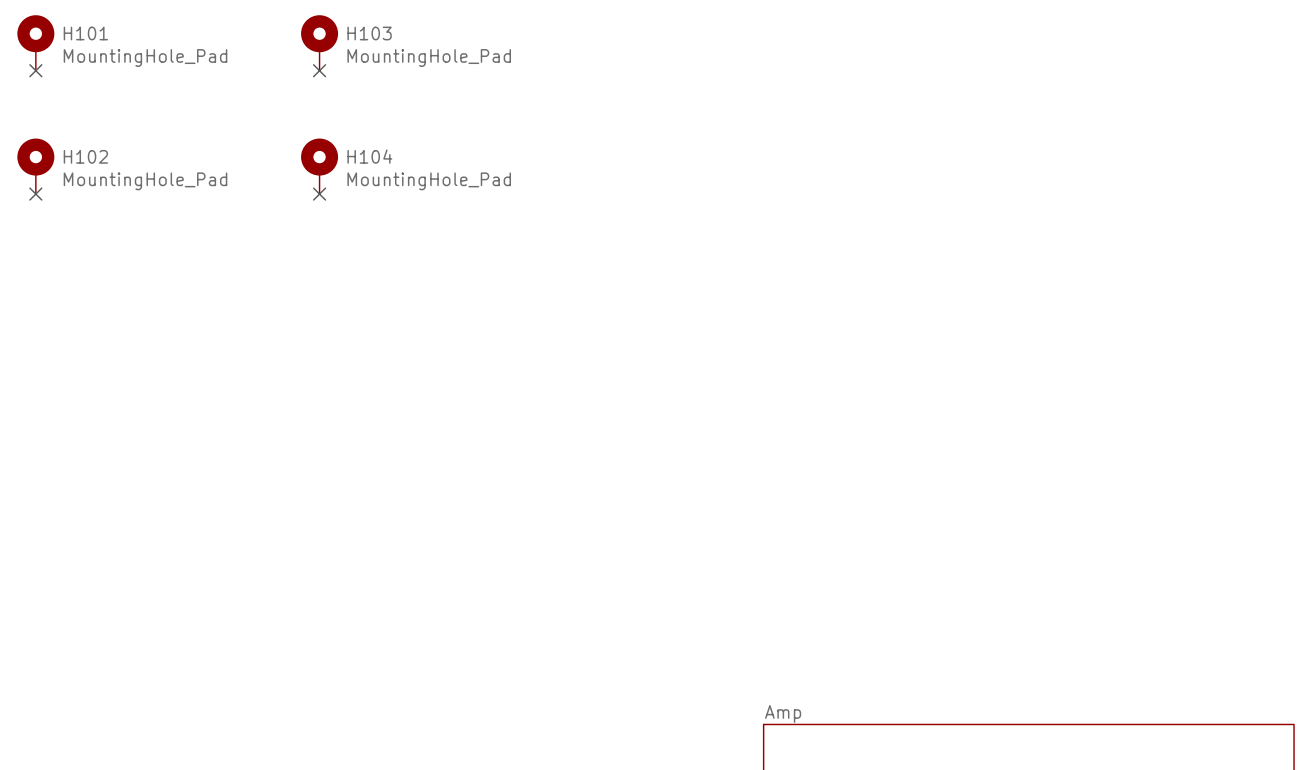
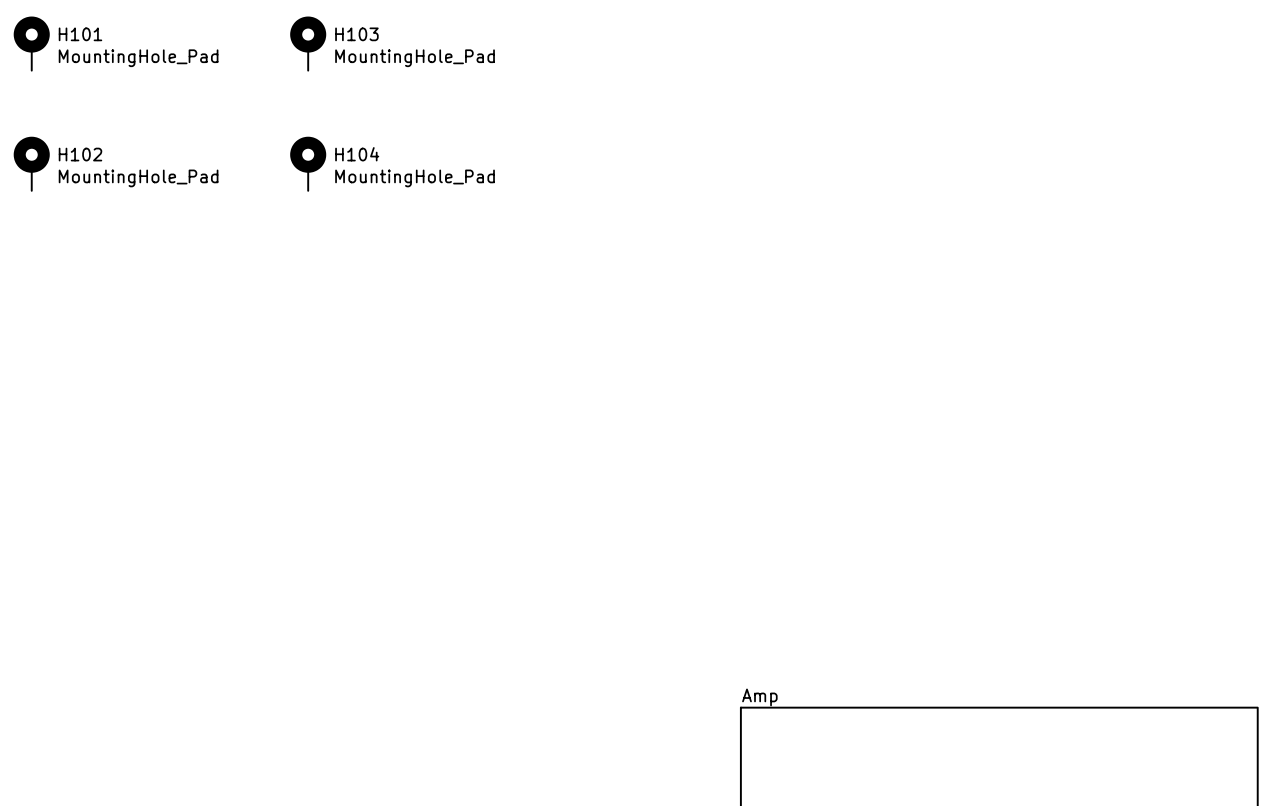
no-connect mark: (35, 70) -> none
no-connect mark: (319, 70) -> none
no-connect mark: (35, 194) -> none
no-connect mark: (319, 194) -> none

